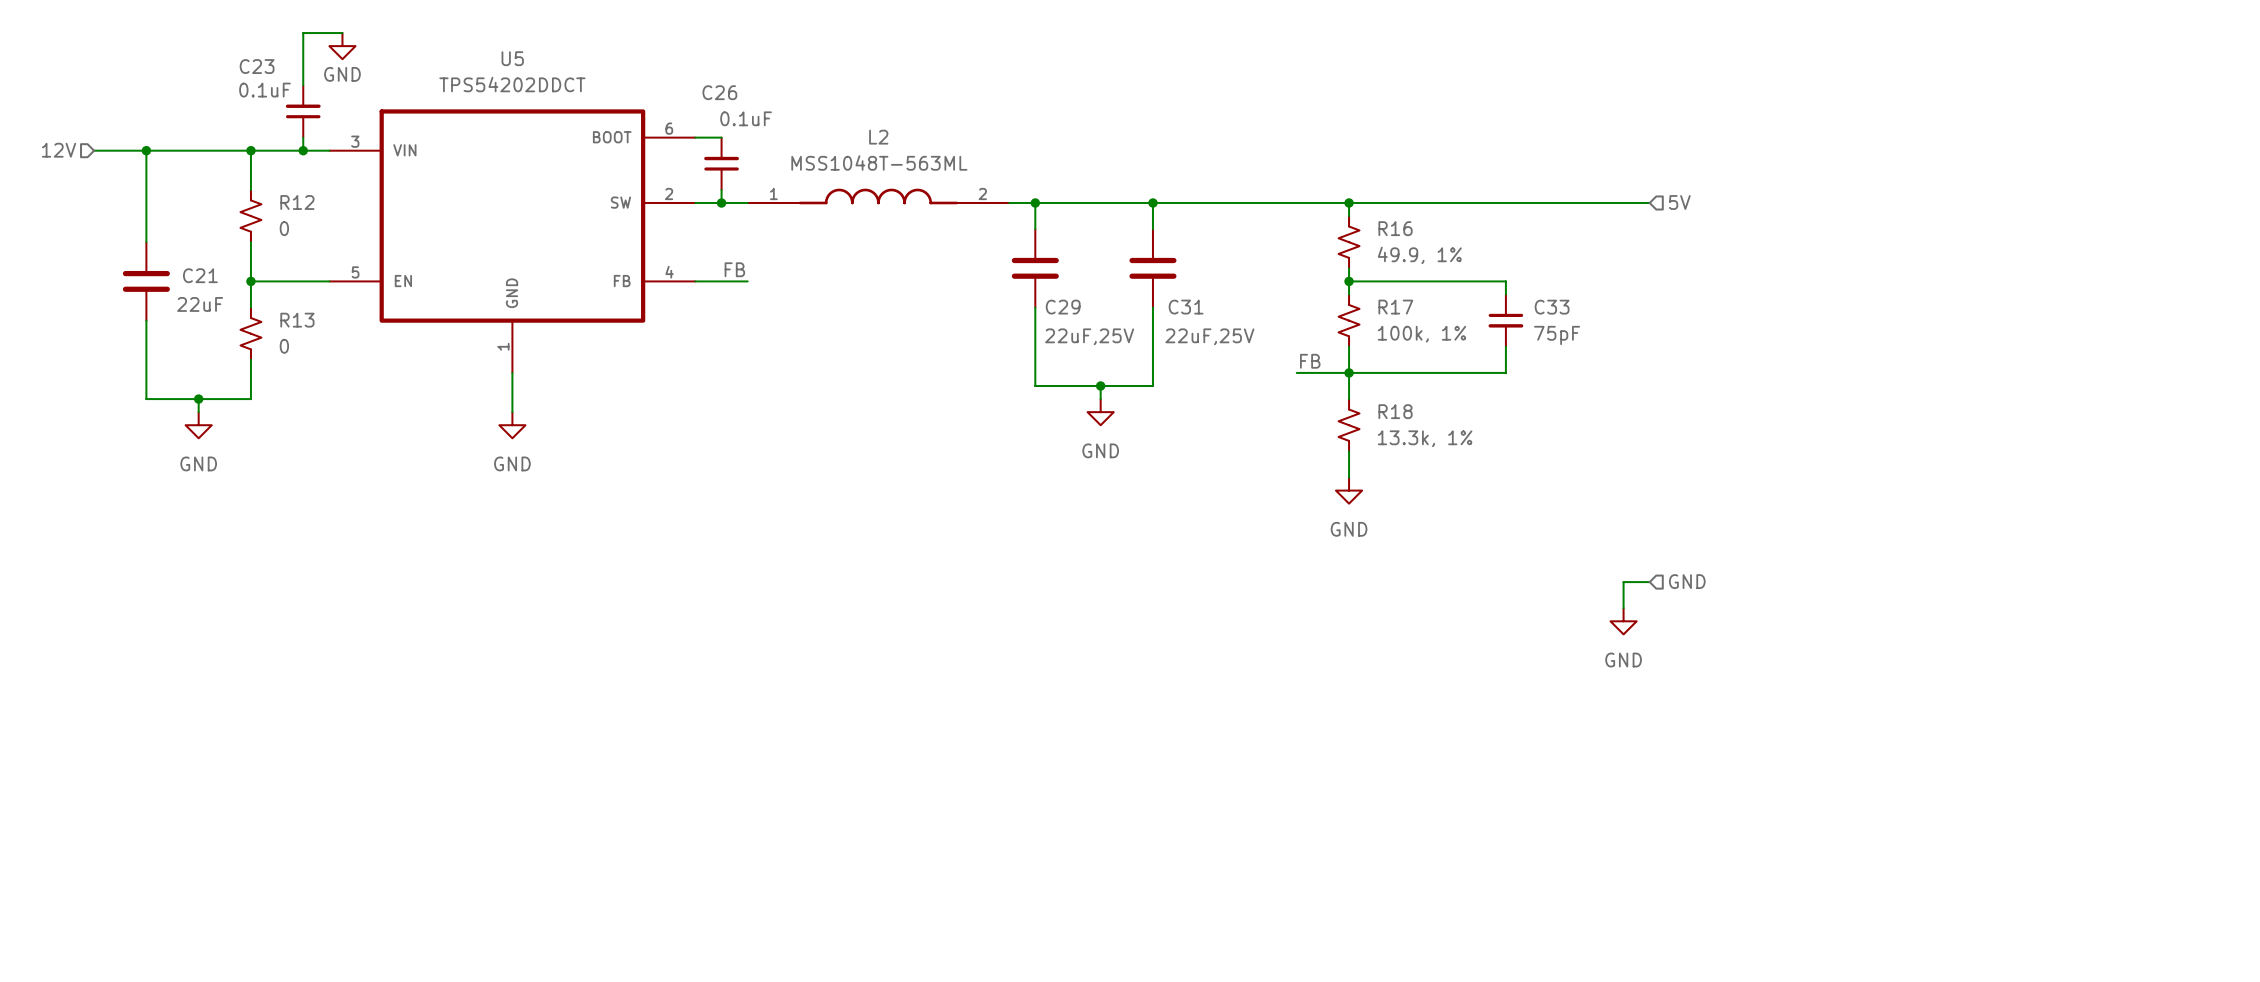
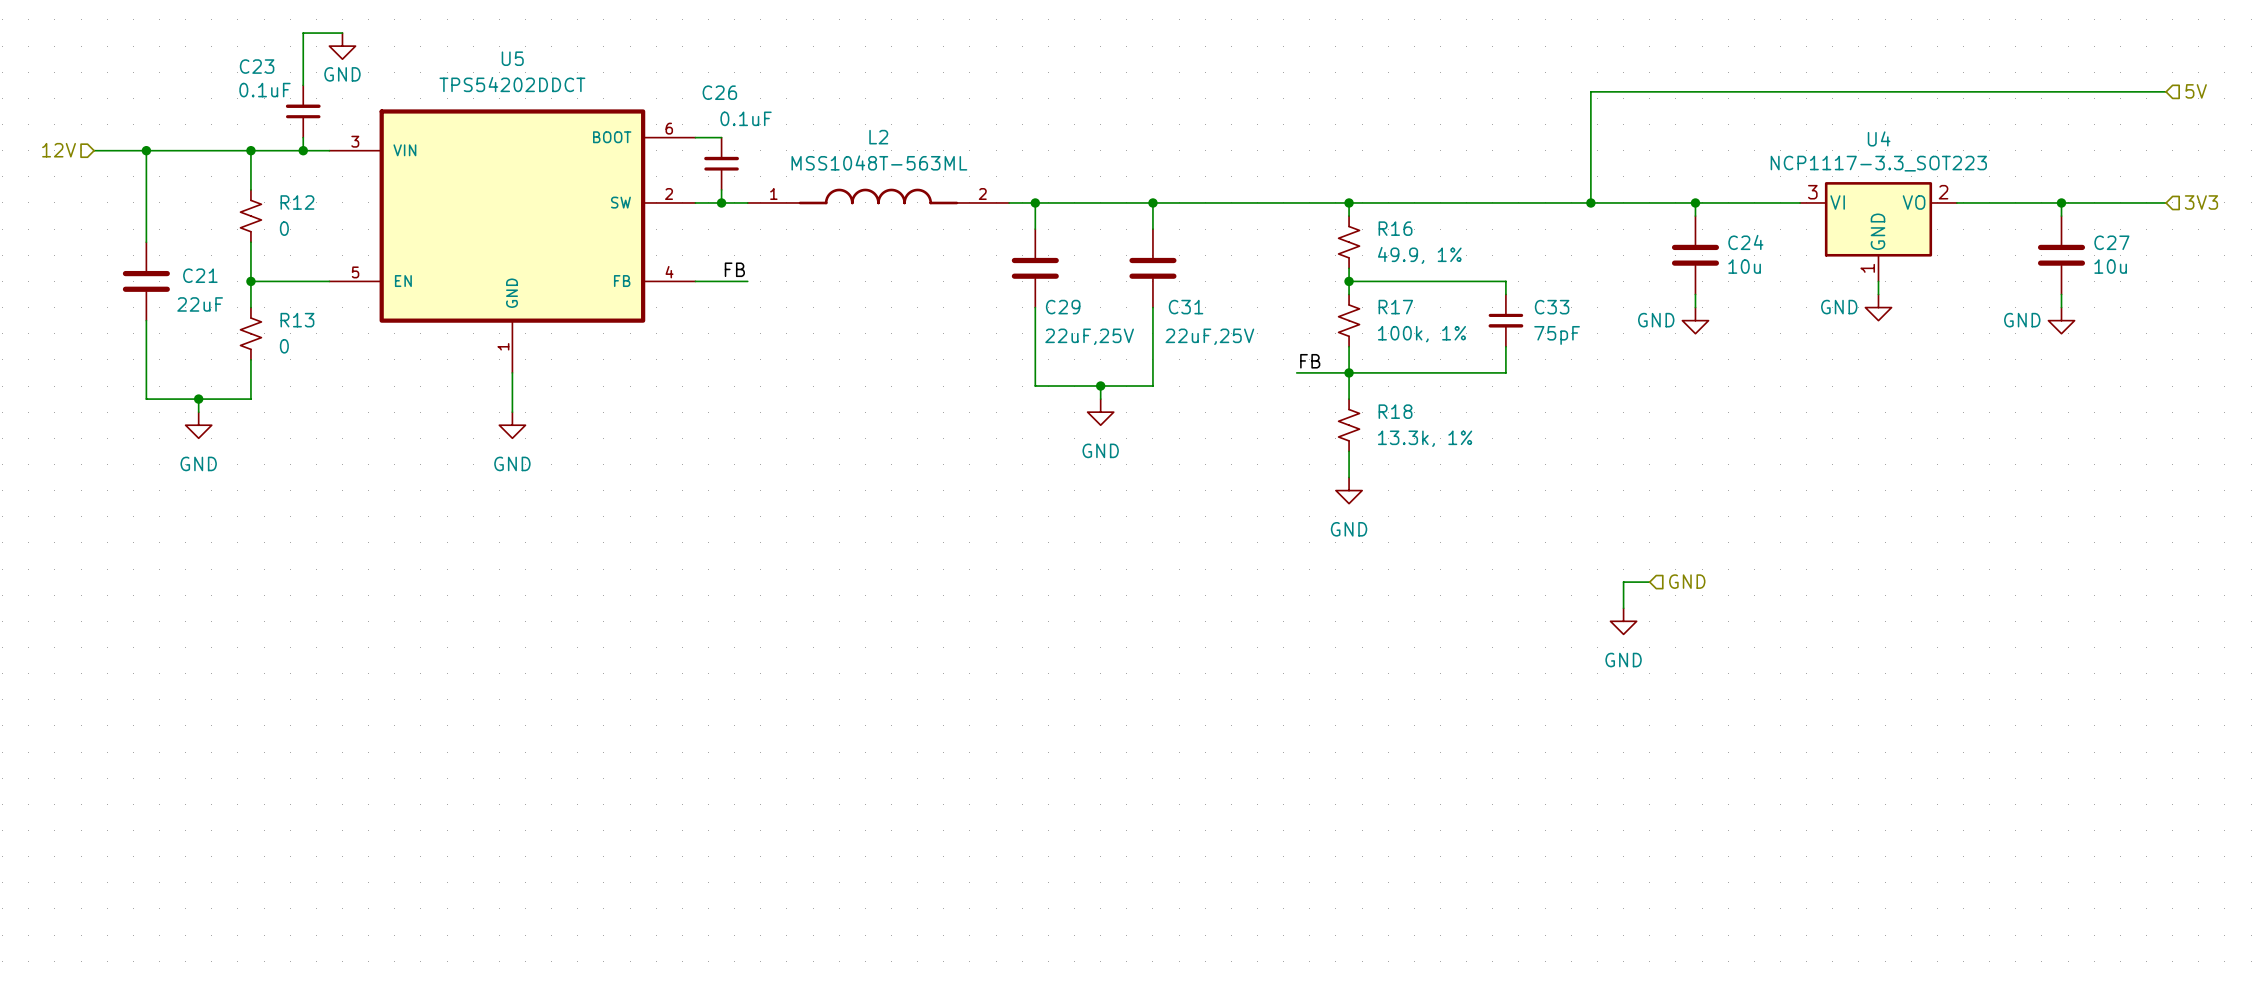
wire: none -> (2166, 91) (1590, 91) (1590, 202)
hierarchical label: none -> 5V (2196, 91)
junction: none -> (1590, 202)
wire: none -> (1649, 202) (1800, 202)
hierarchical label: 5V (1679, 202) -> none
wire: none -> (1695, 202) (1695, 216)
junction: none -> (1695, 202)
wire: none -> (1956, 202) (2166, 202)
wire: none -> (2061, 202) (2061, 216)
junction: none -> (2061, 202)
hierarchical label: none -> 3V3 (2201, 202)
U4: none -> NCP1117-3.3_SOT223 (1878, 231)
C24: none -> 10u (1695, 255)
C27: none -> 10u (2061, 255)
wire: none -> (1878, 281) (1878, 294)
wire: none -> (1695, 294) (1695, 307)
wire: none -> (2061, 294) (2061, 307)
power symbol: none -> GND (1878, 307)
power symbol: none -> GND (1695, 320)
power symbol: none -> GND (2061, 320)

